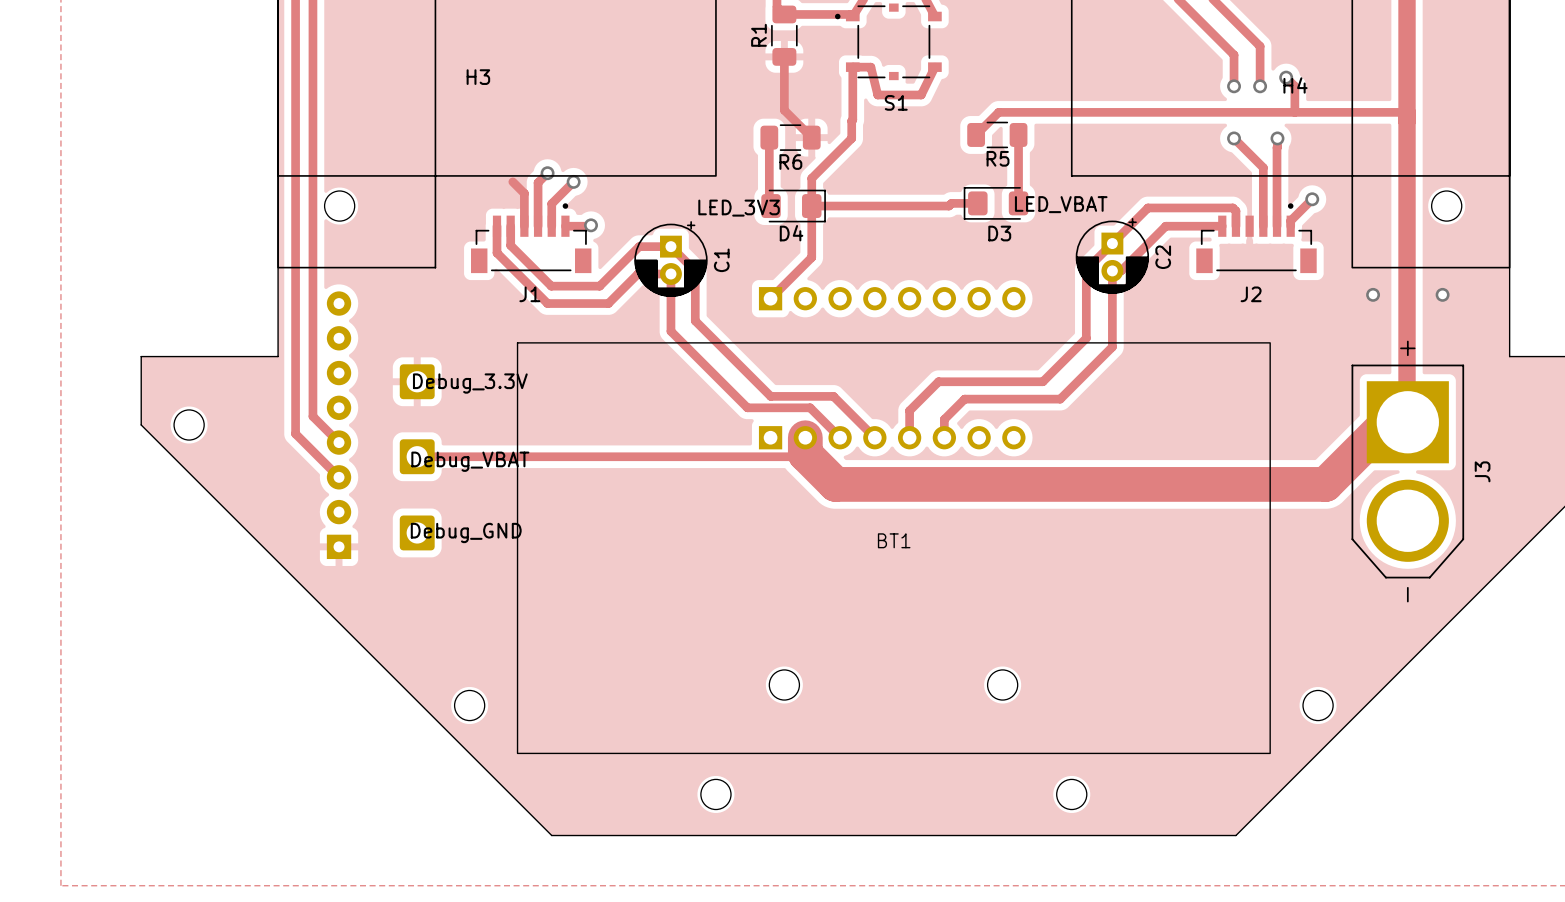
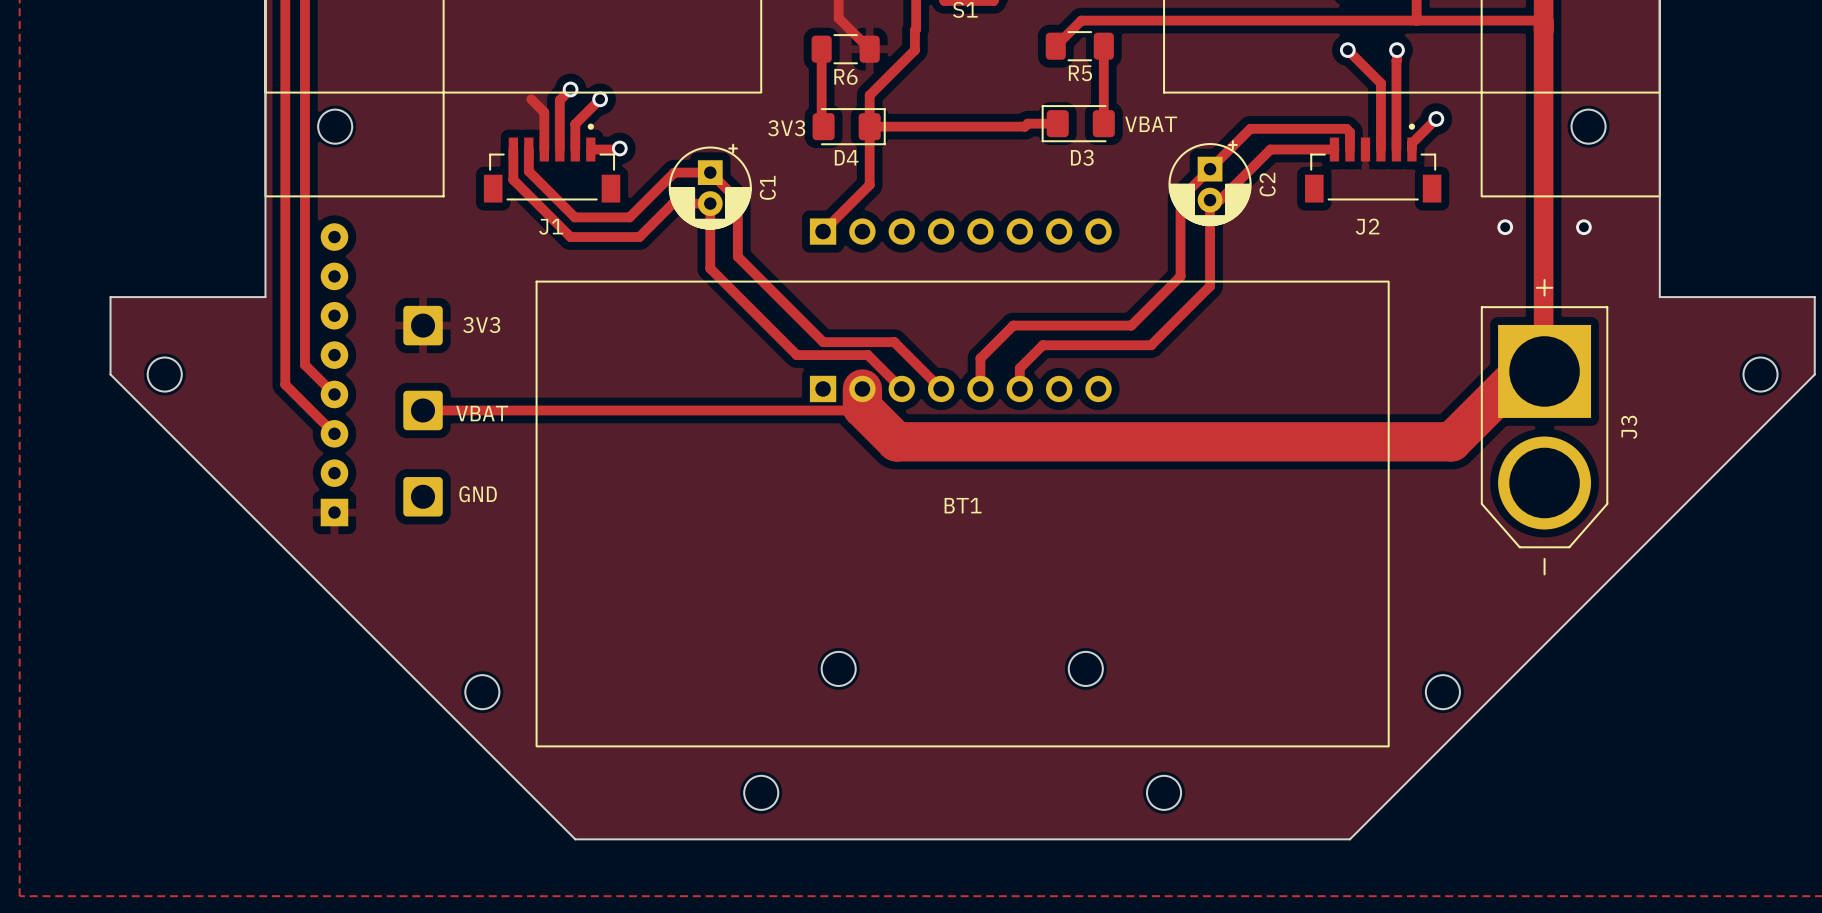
D3 value: LED_VBAT (1061, 204) -> VBAT (1151, 124)
D4 value: LED_3V3 (739, 208) -> 3V3 (786, 128)
part value: Debug_3.3V (470, 383) -> 3V3 (481, 325)
part value: Debug_VBAT (470, 461) -> VBAT (482, 413)
part value: Debug_GND (466, 532) -> GND (478, 494)

